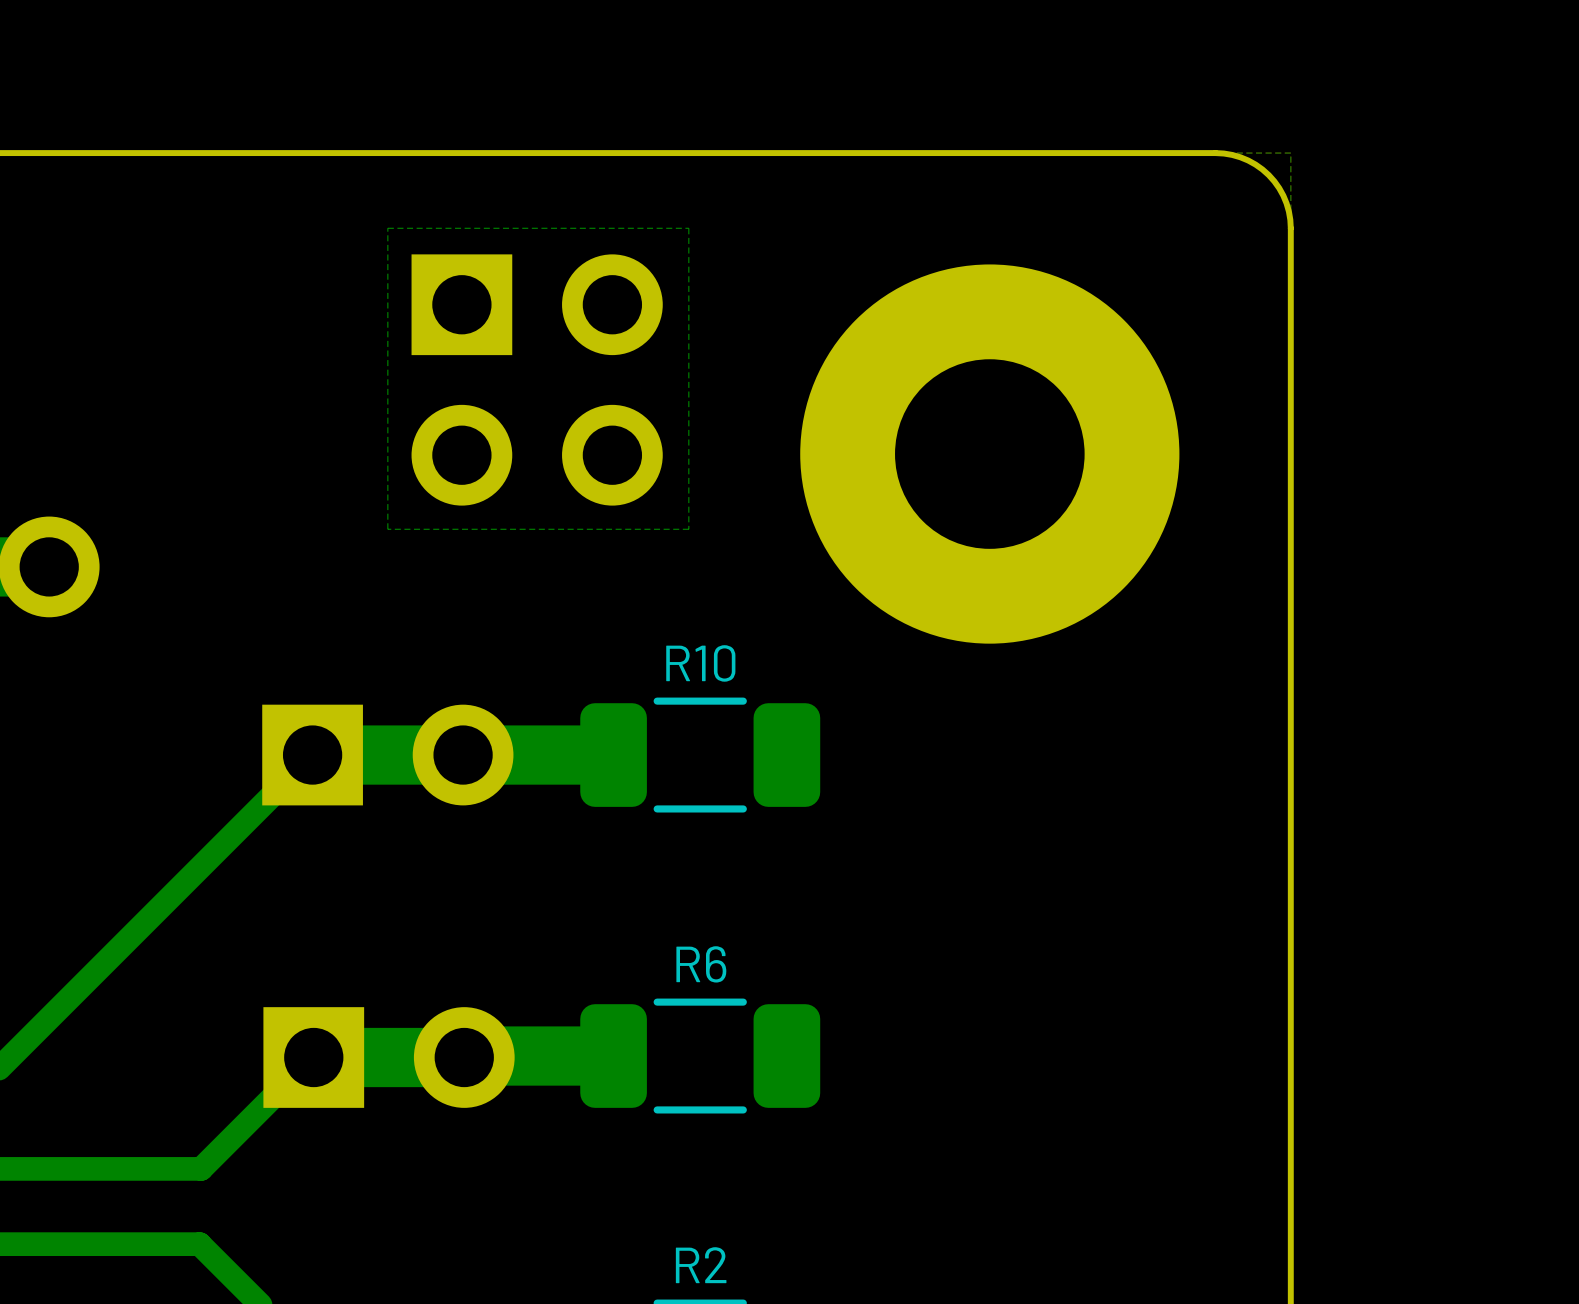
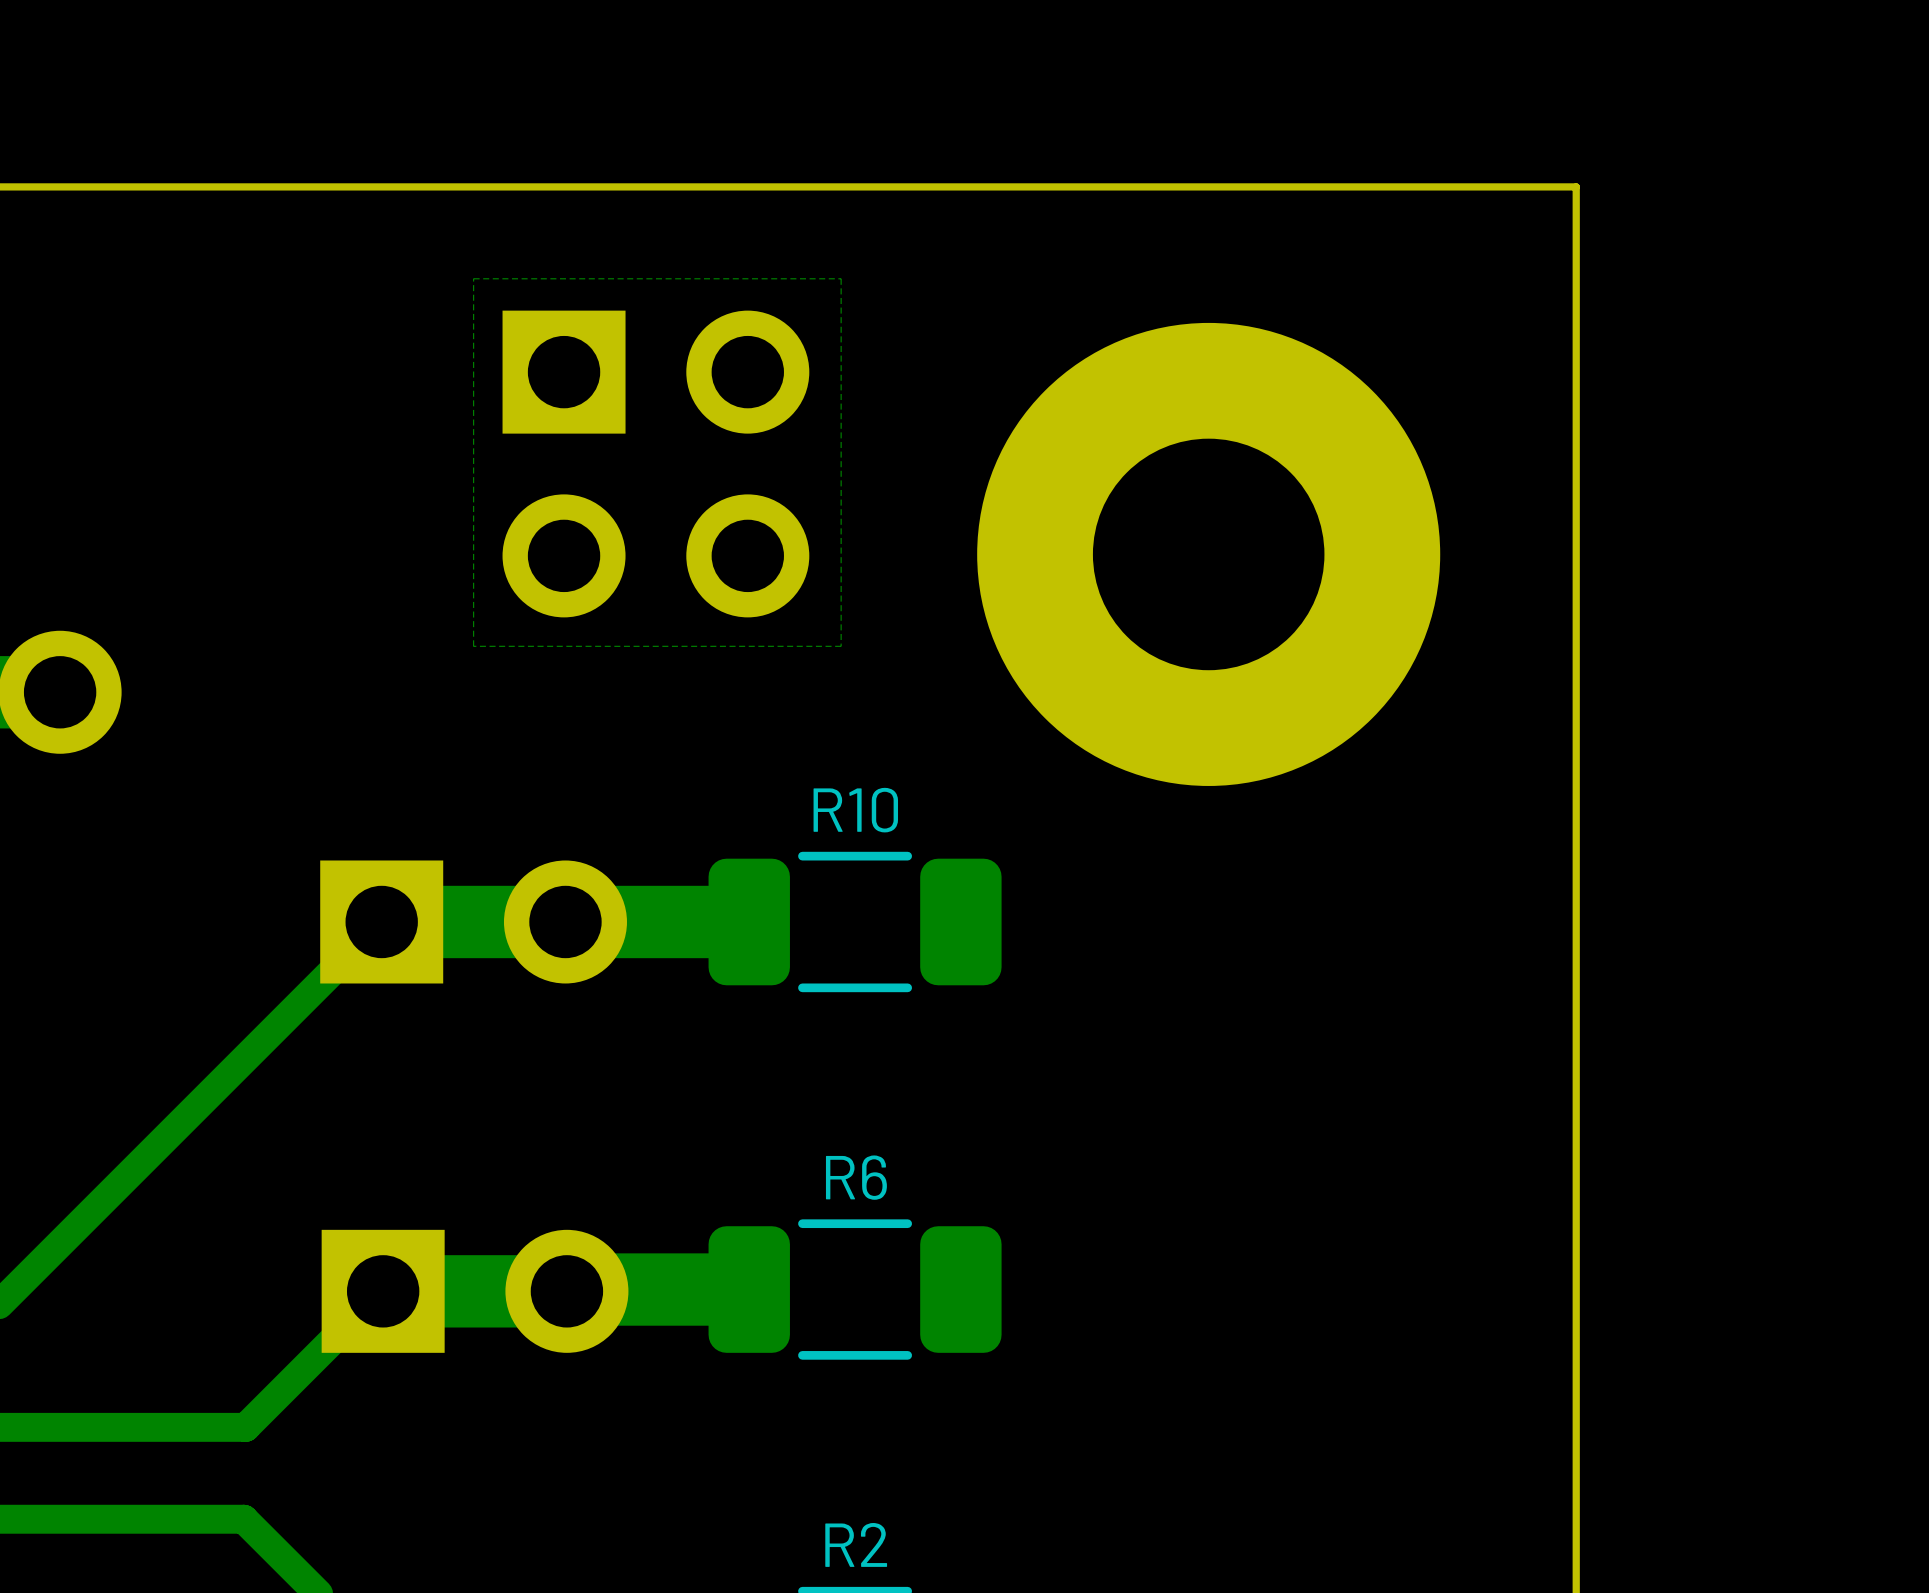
board edge: (1215, 153) (1240, 157) (1255, 164) (1268, 175) (1283, 195) (1288, 211) (1290, 228) -> (1484, 186) (1576, 186) (1576, 278)

